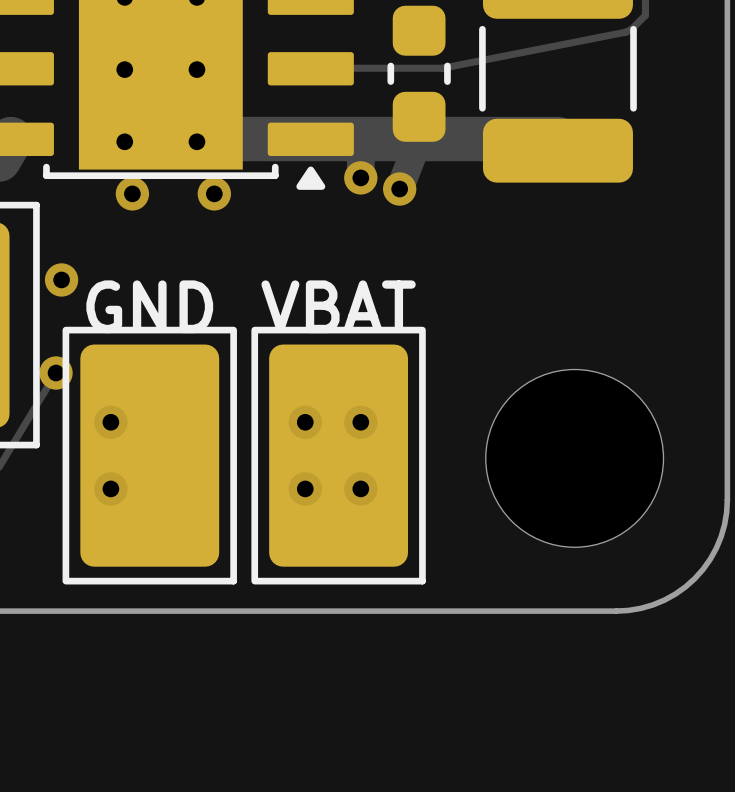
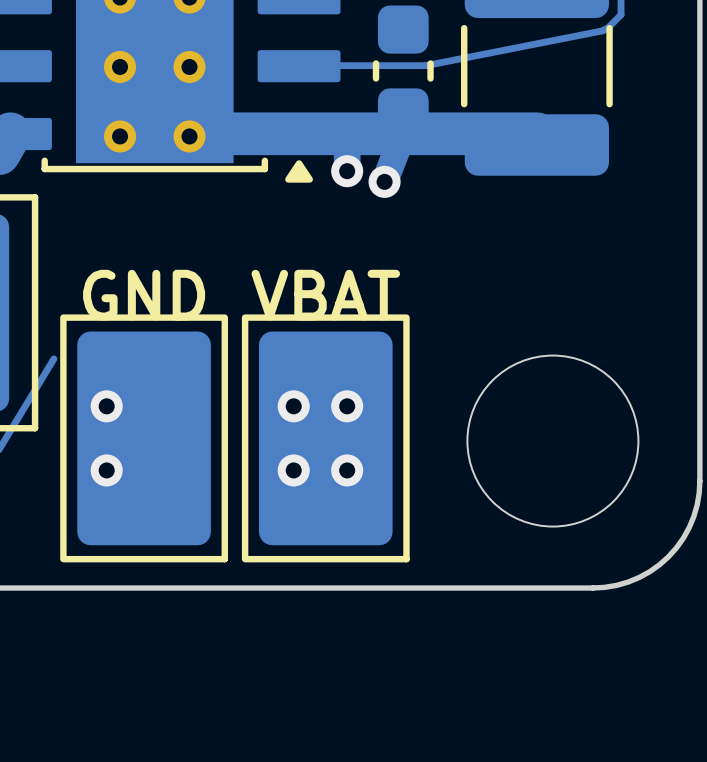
via: (132, 193) -> none
via: (214, 193) -> none
via: (61, 279) -> none
via: (56, 372) -> none

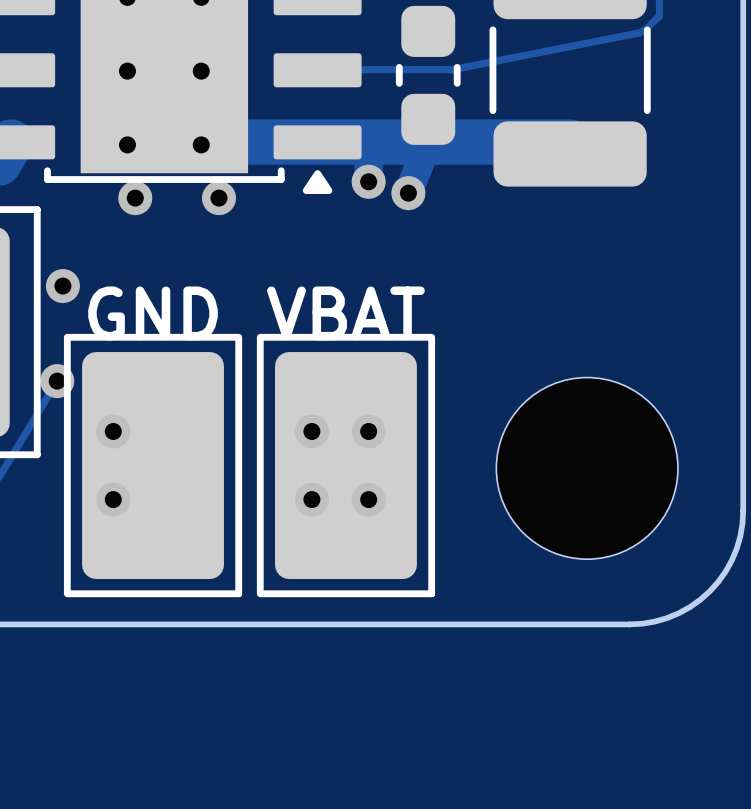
via: none -> (135, 198)
via: none -> (218, 198)
via: none -> (62, 286)
via: none -> (57, 381)

